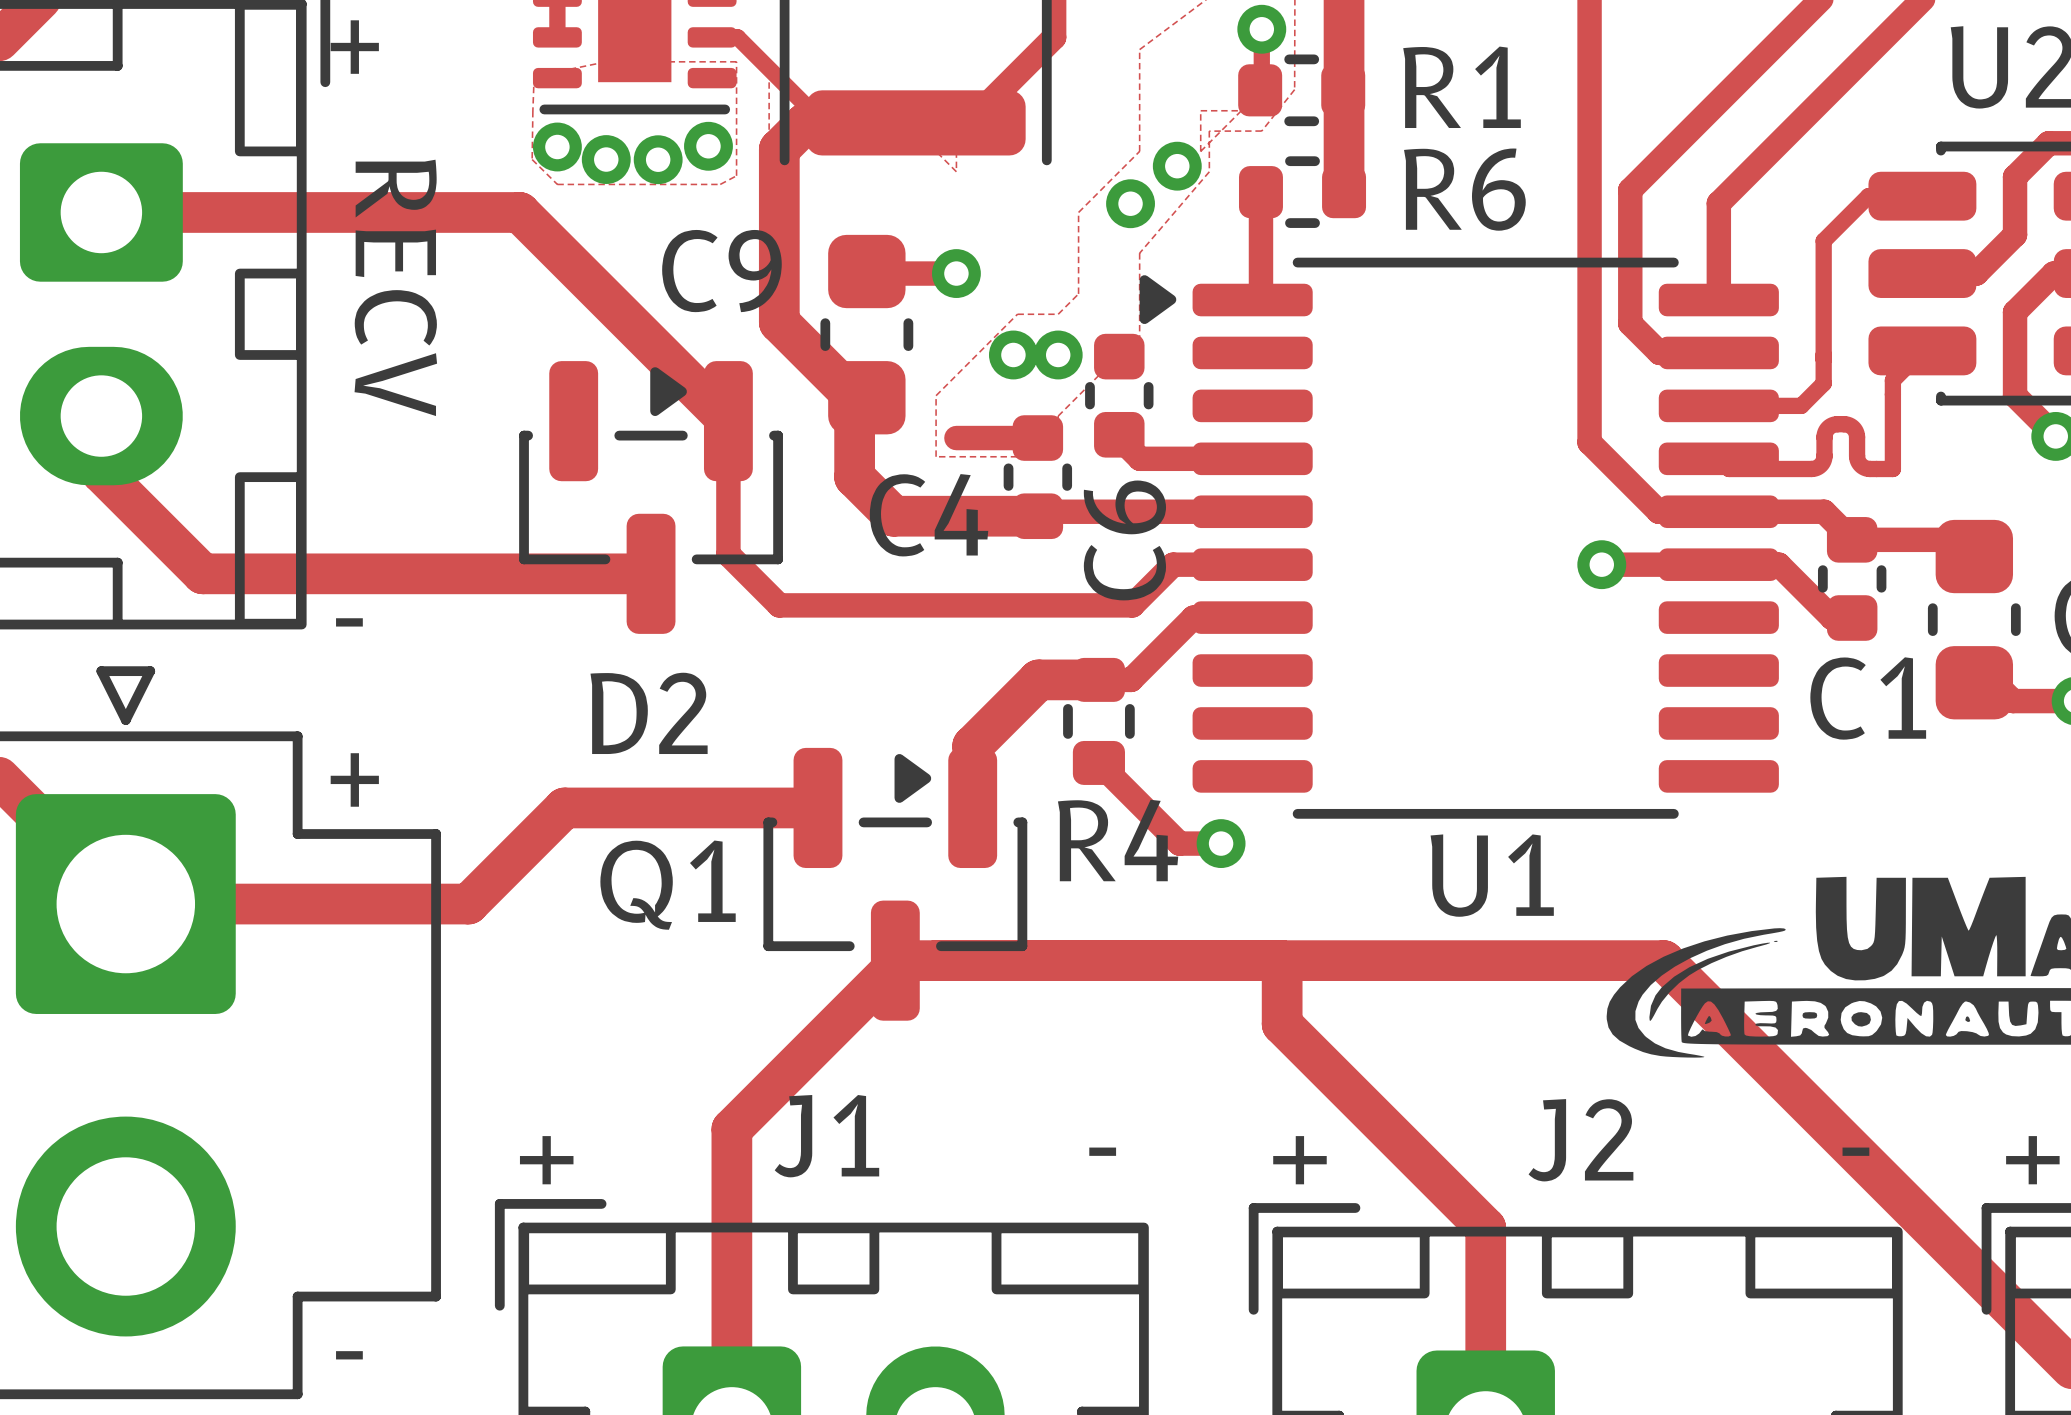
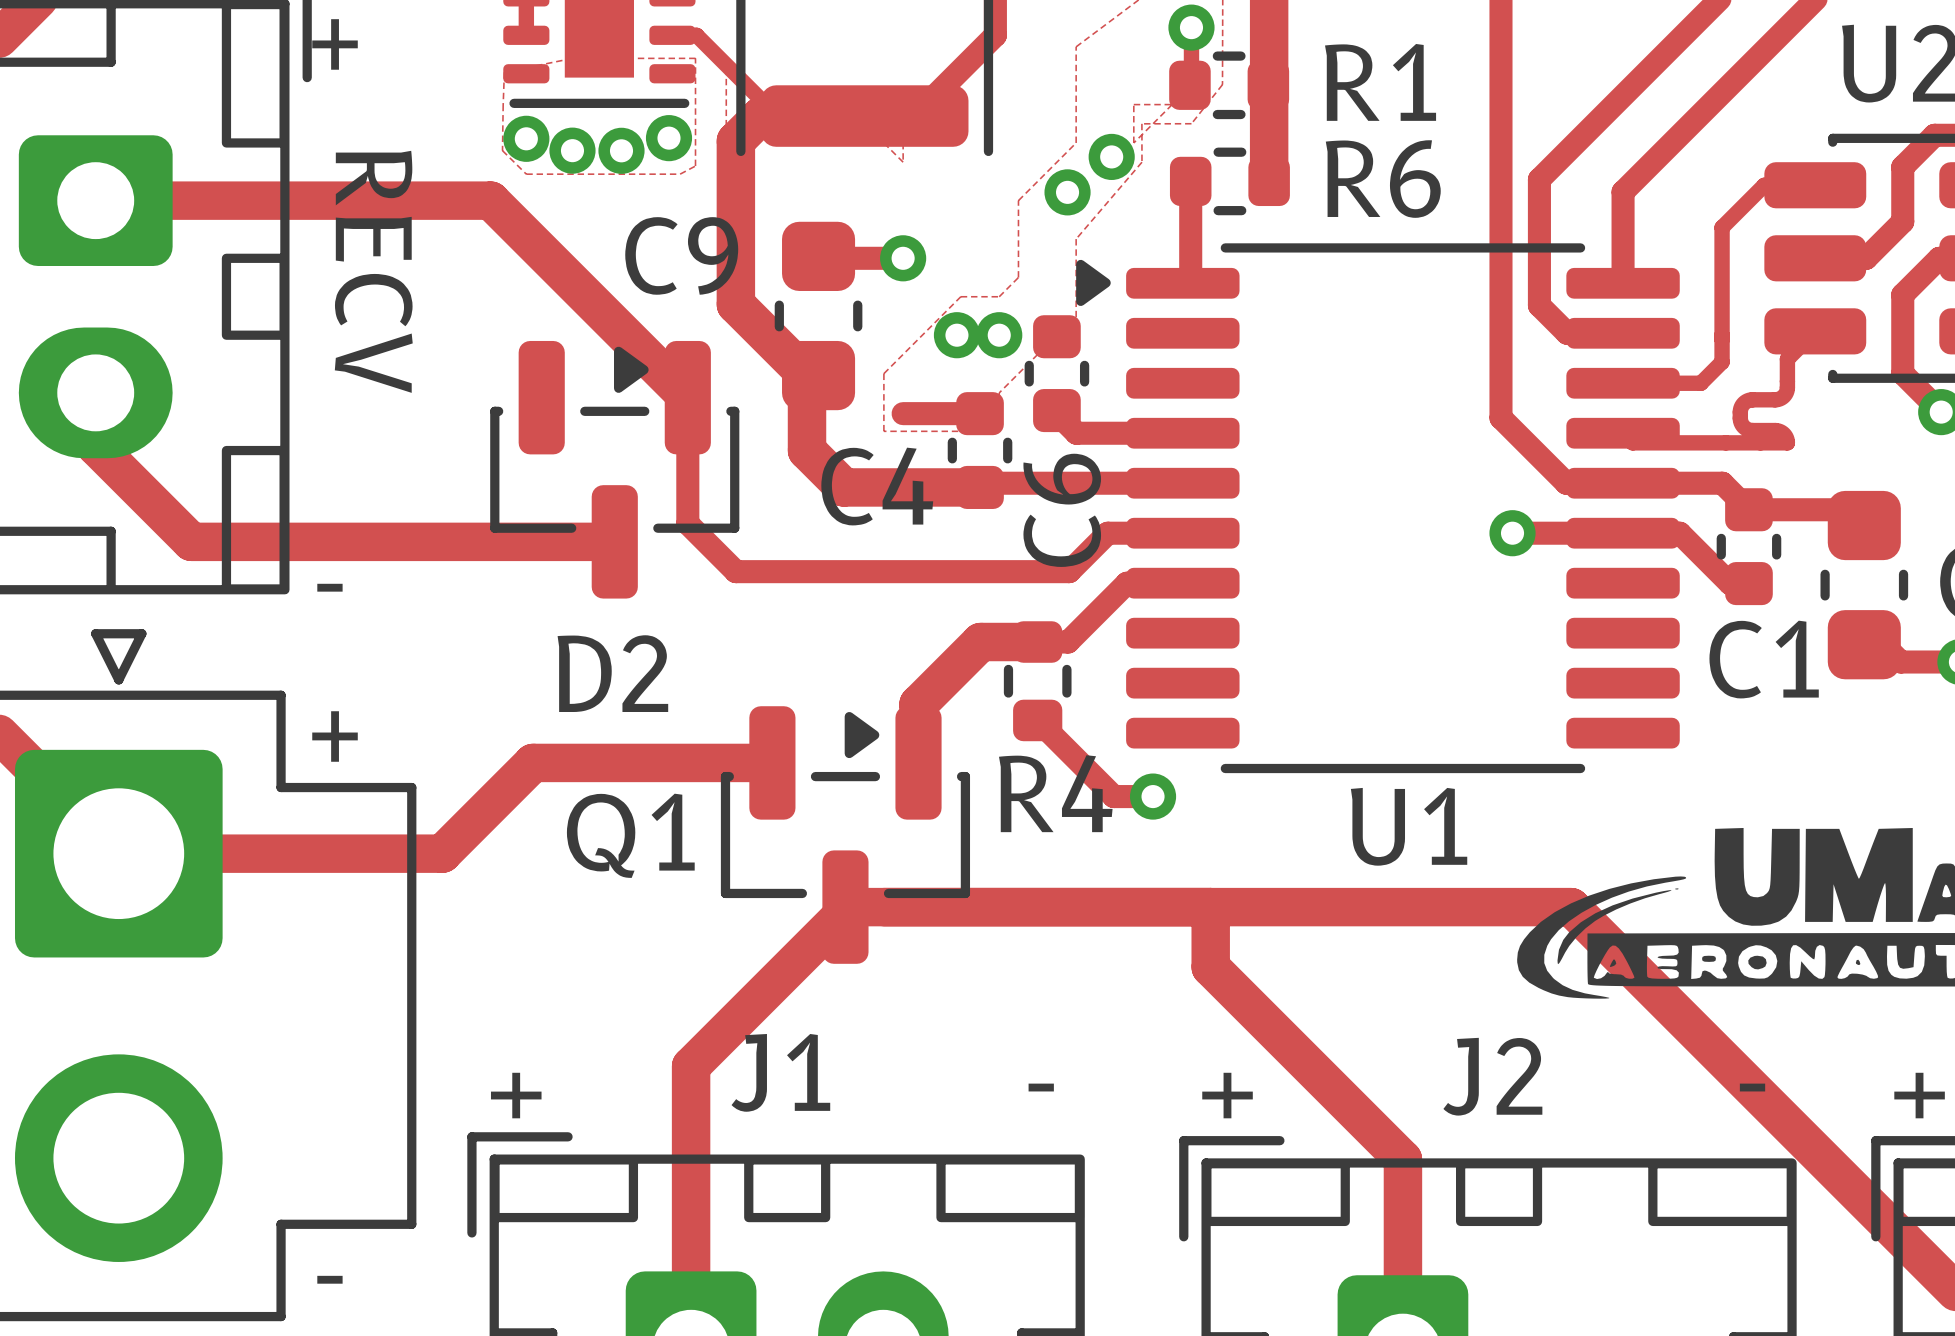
top track: (1892, 410) (1892, 468) -> (1787, 387) (1784, 394) (1779, 398) (1746, 401) (1741, 405) (1740, 412) (1741, 422) (1746, 428) (1779, 431) (1785, 436) (1787, 442)
top track: (1811, 468) (1819, 466) (1823, 460) (1826, 430) (1831, 425) (1837, 424) (1847, 424) (1854, 429) (1856, 435) (1858, 460) (1862, 466) (1870, 468) -> (1710, 442) (1765, 442)

